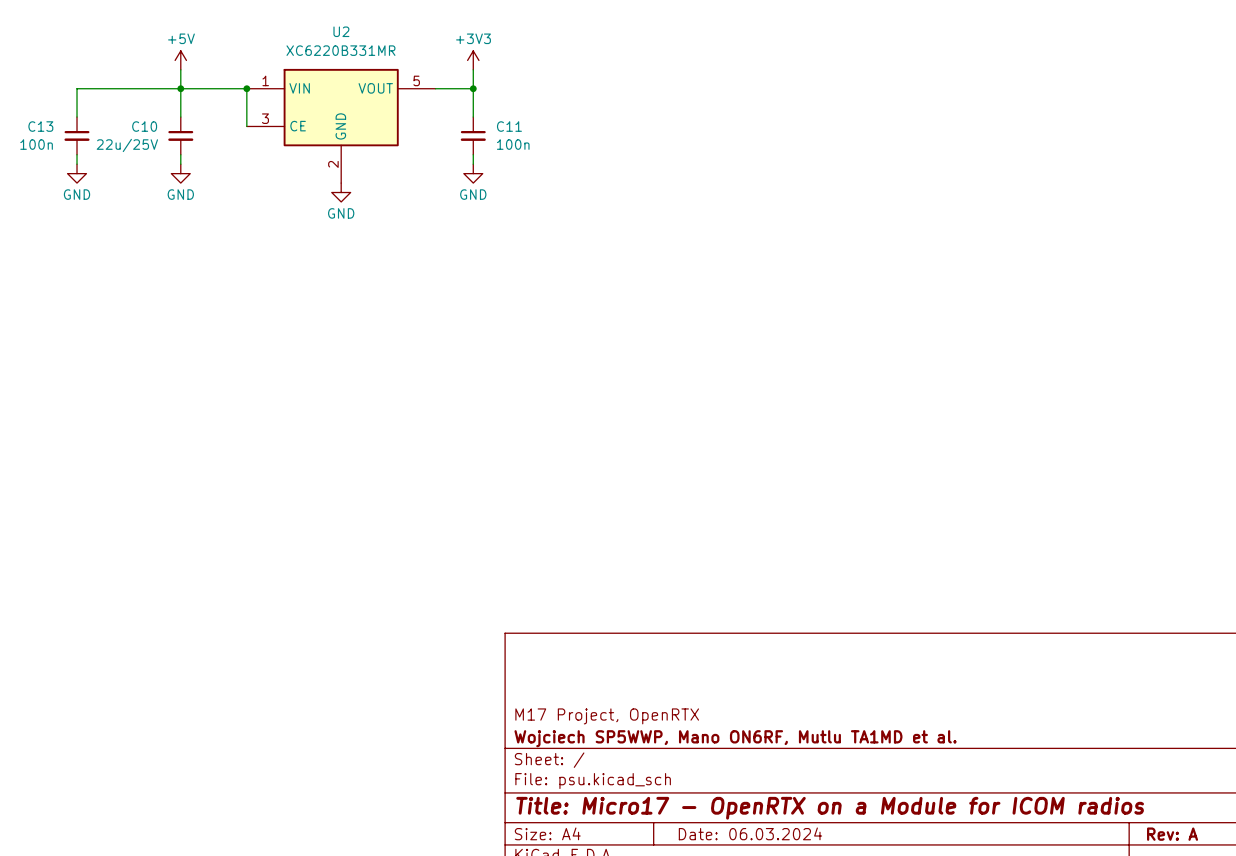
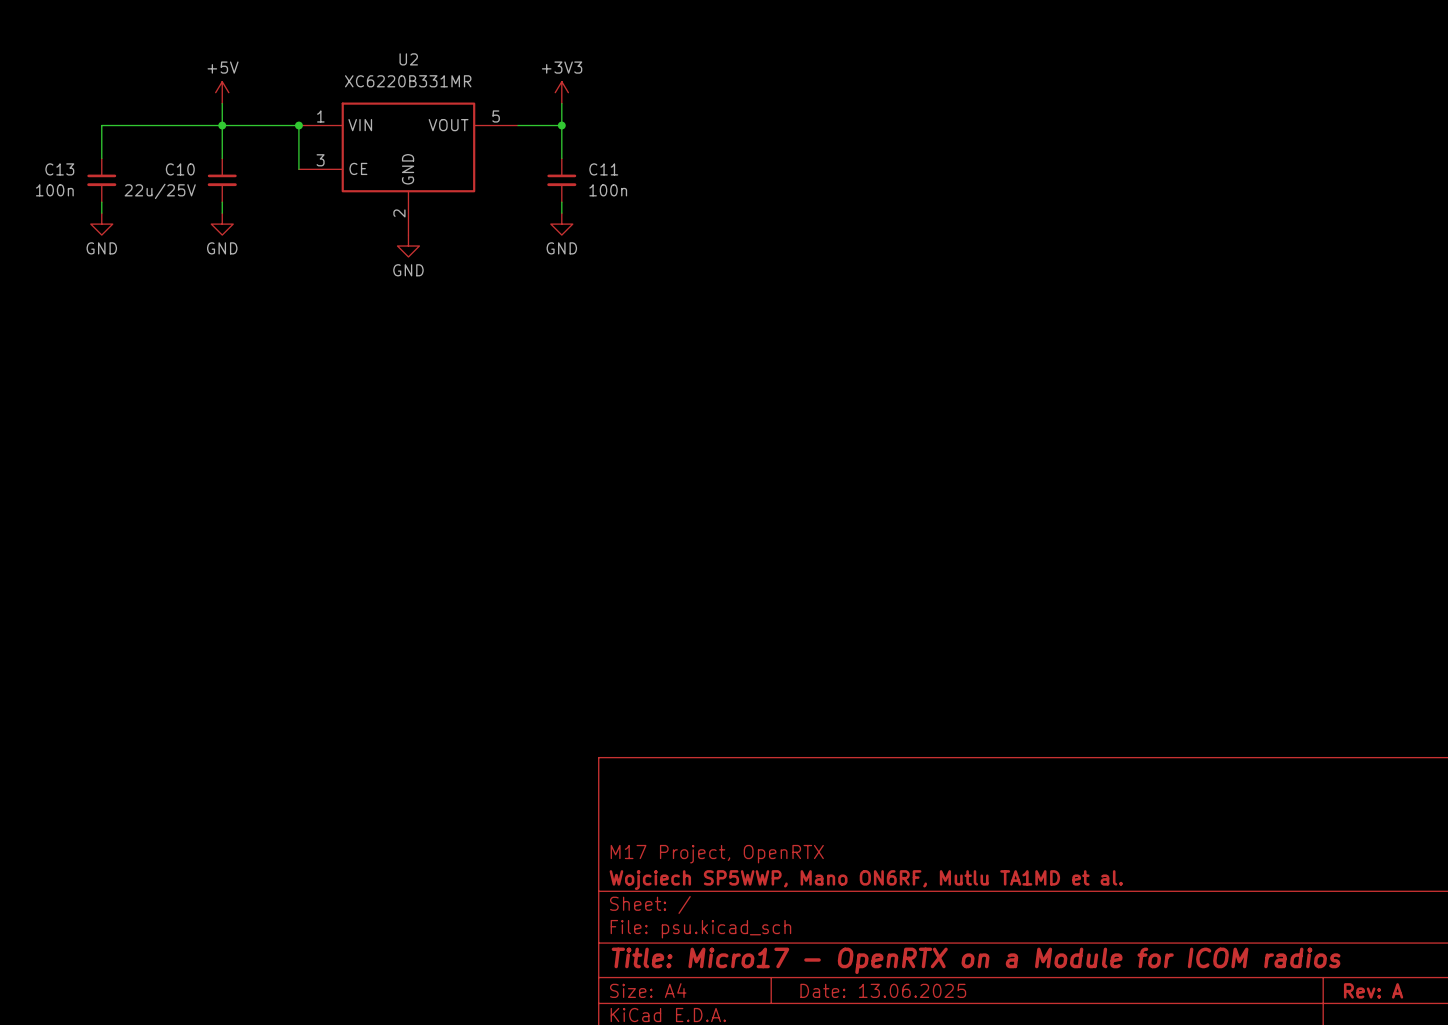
title block: Date: 06.03.2024 (750, 833) -> Date: 13.06.2025 (883, 990)

